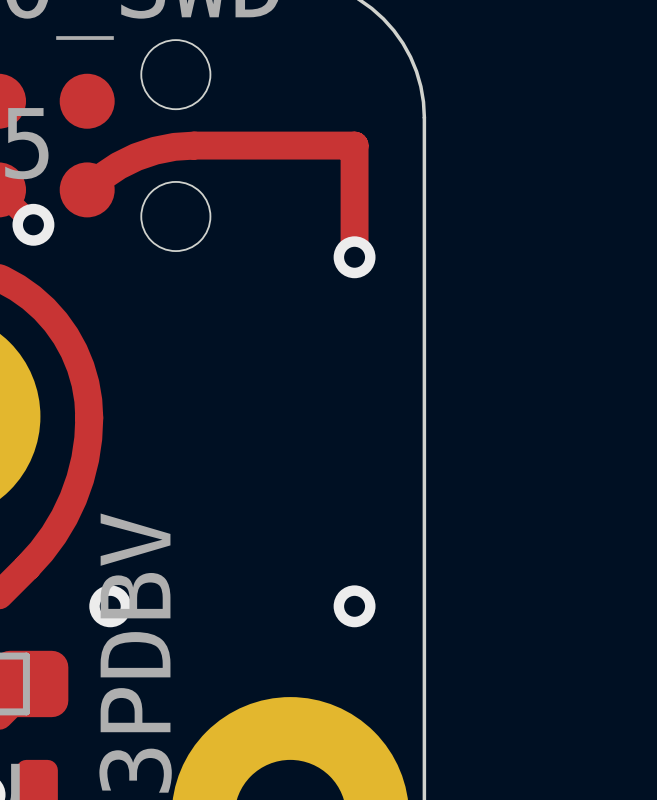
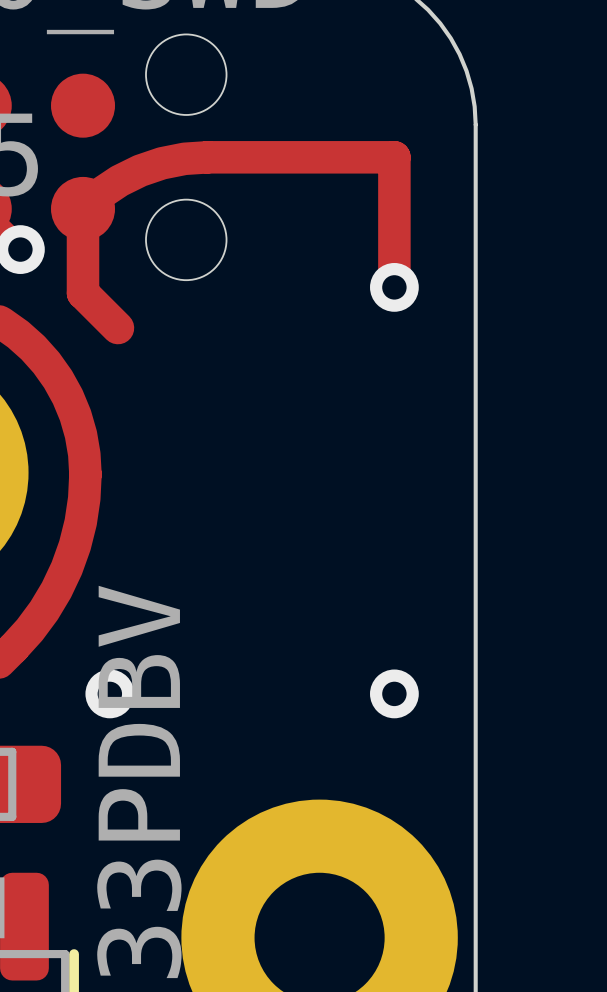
track: none -> (83, 208) (83, 293) (117, 328)

